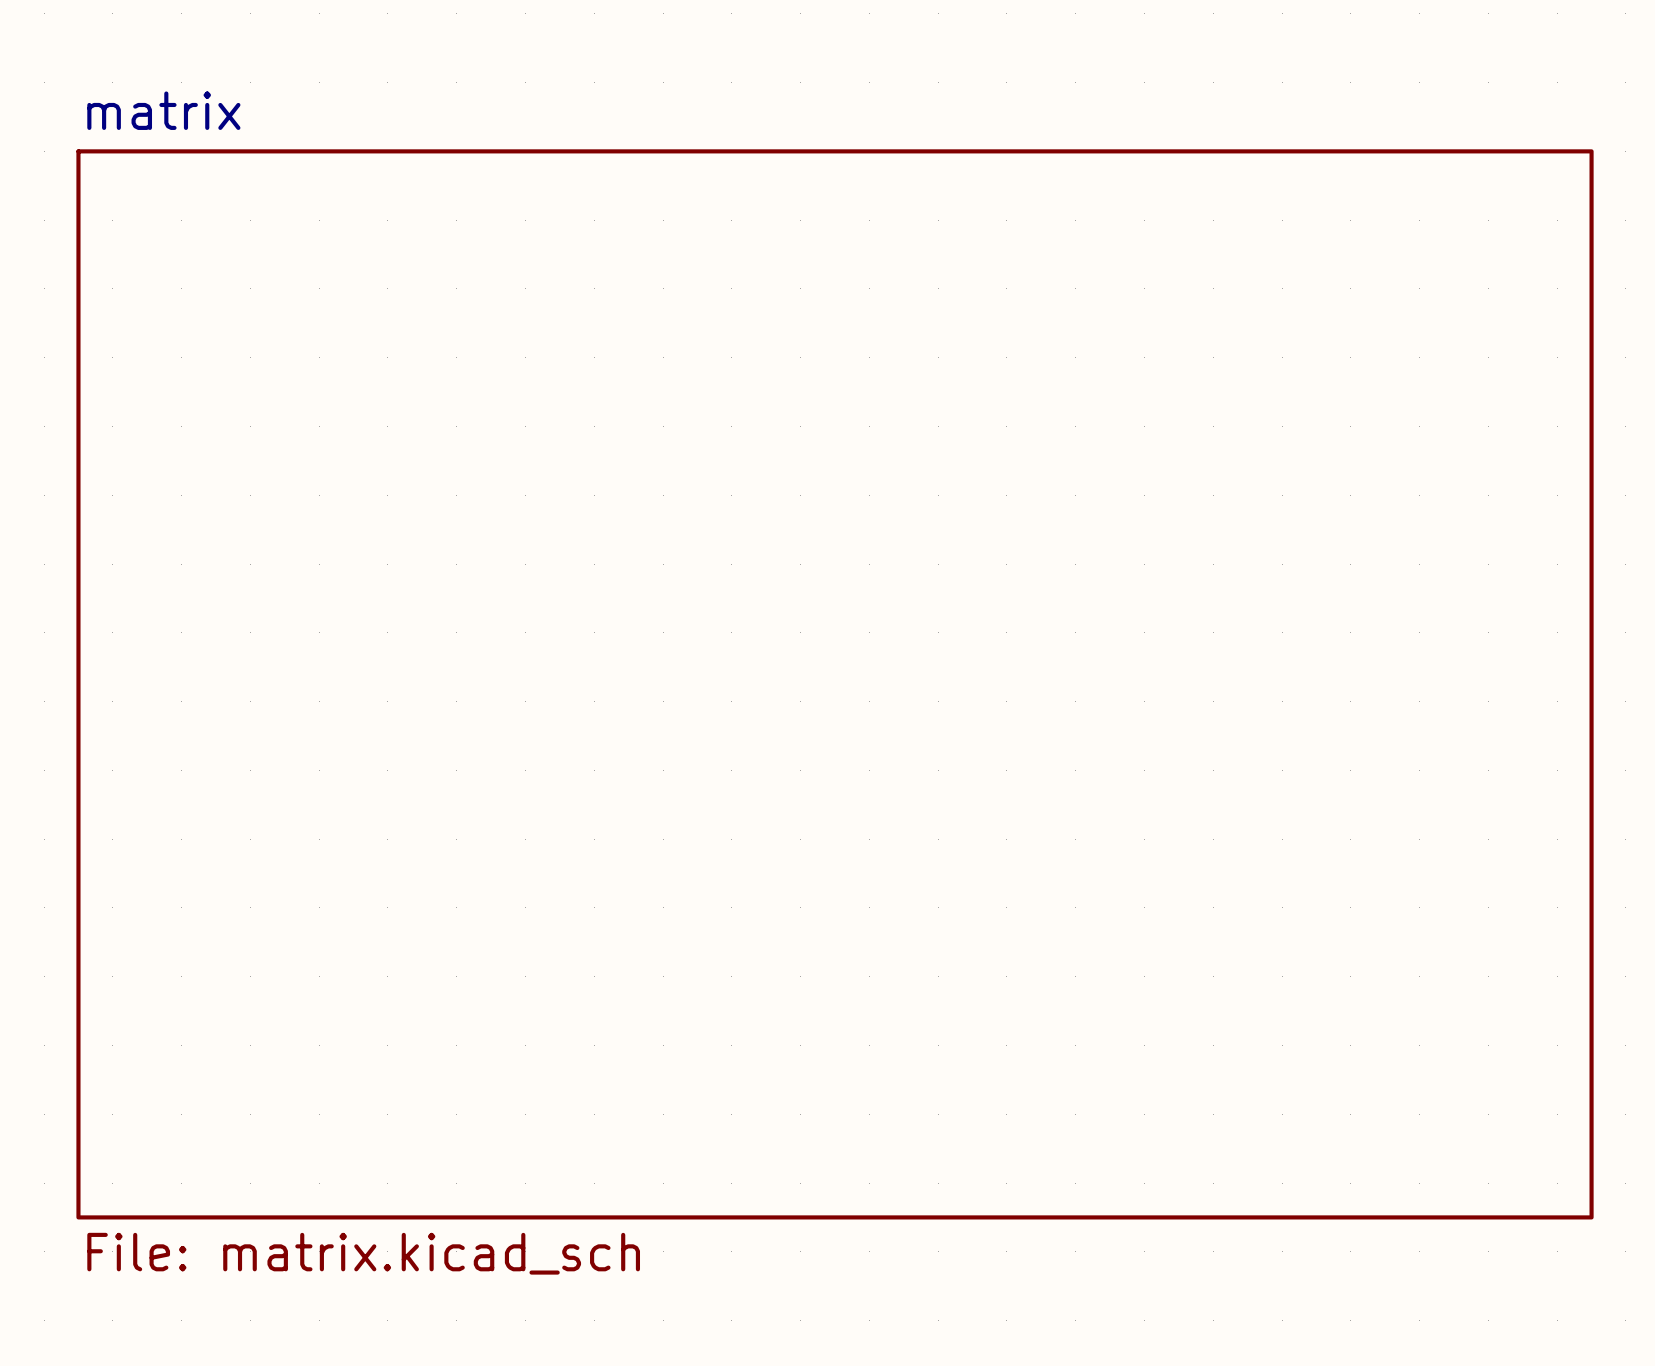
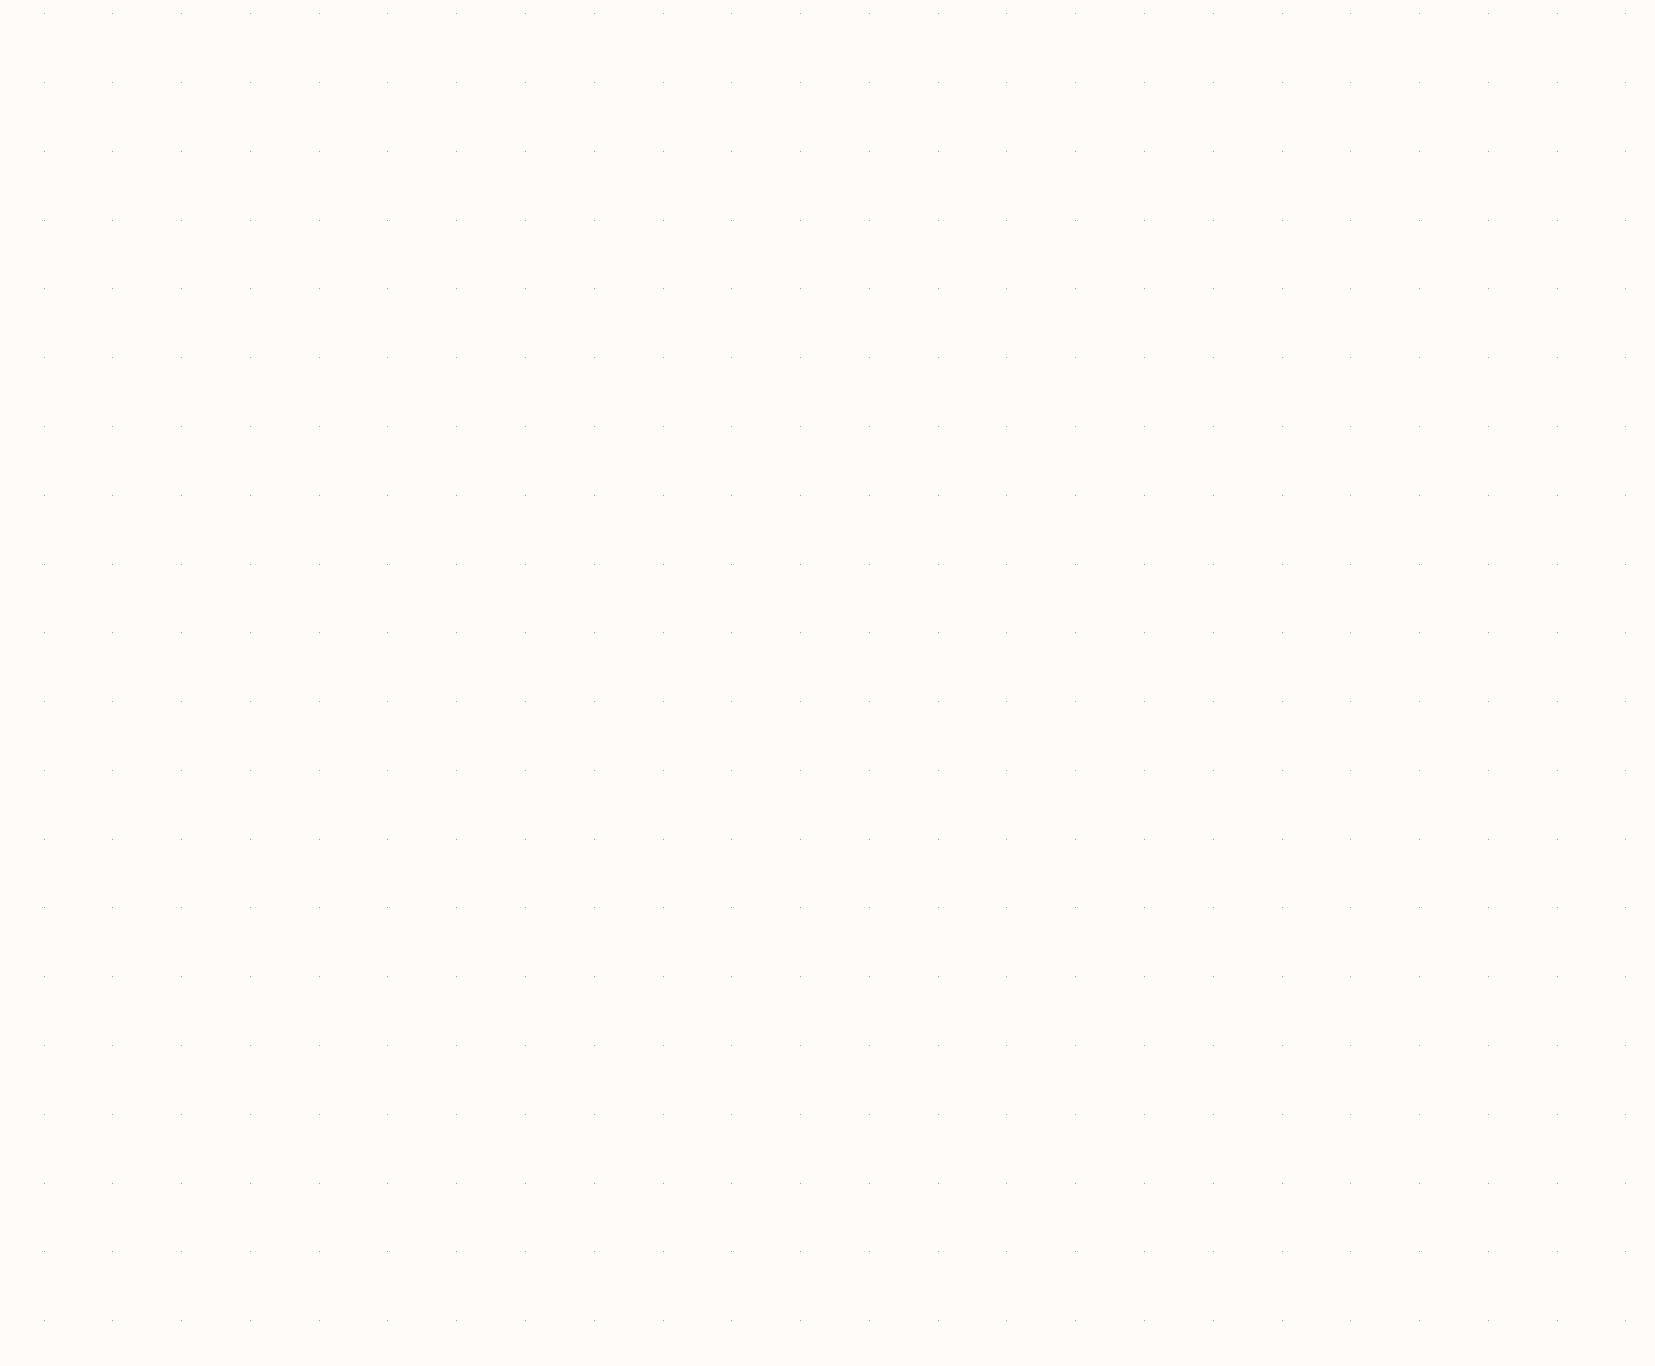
sheet matrix: File: matrix.kicad_sch (835, 684) -> none

